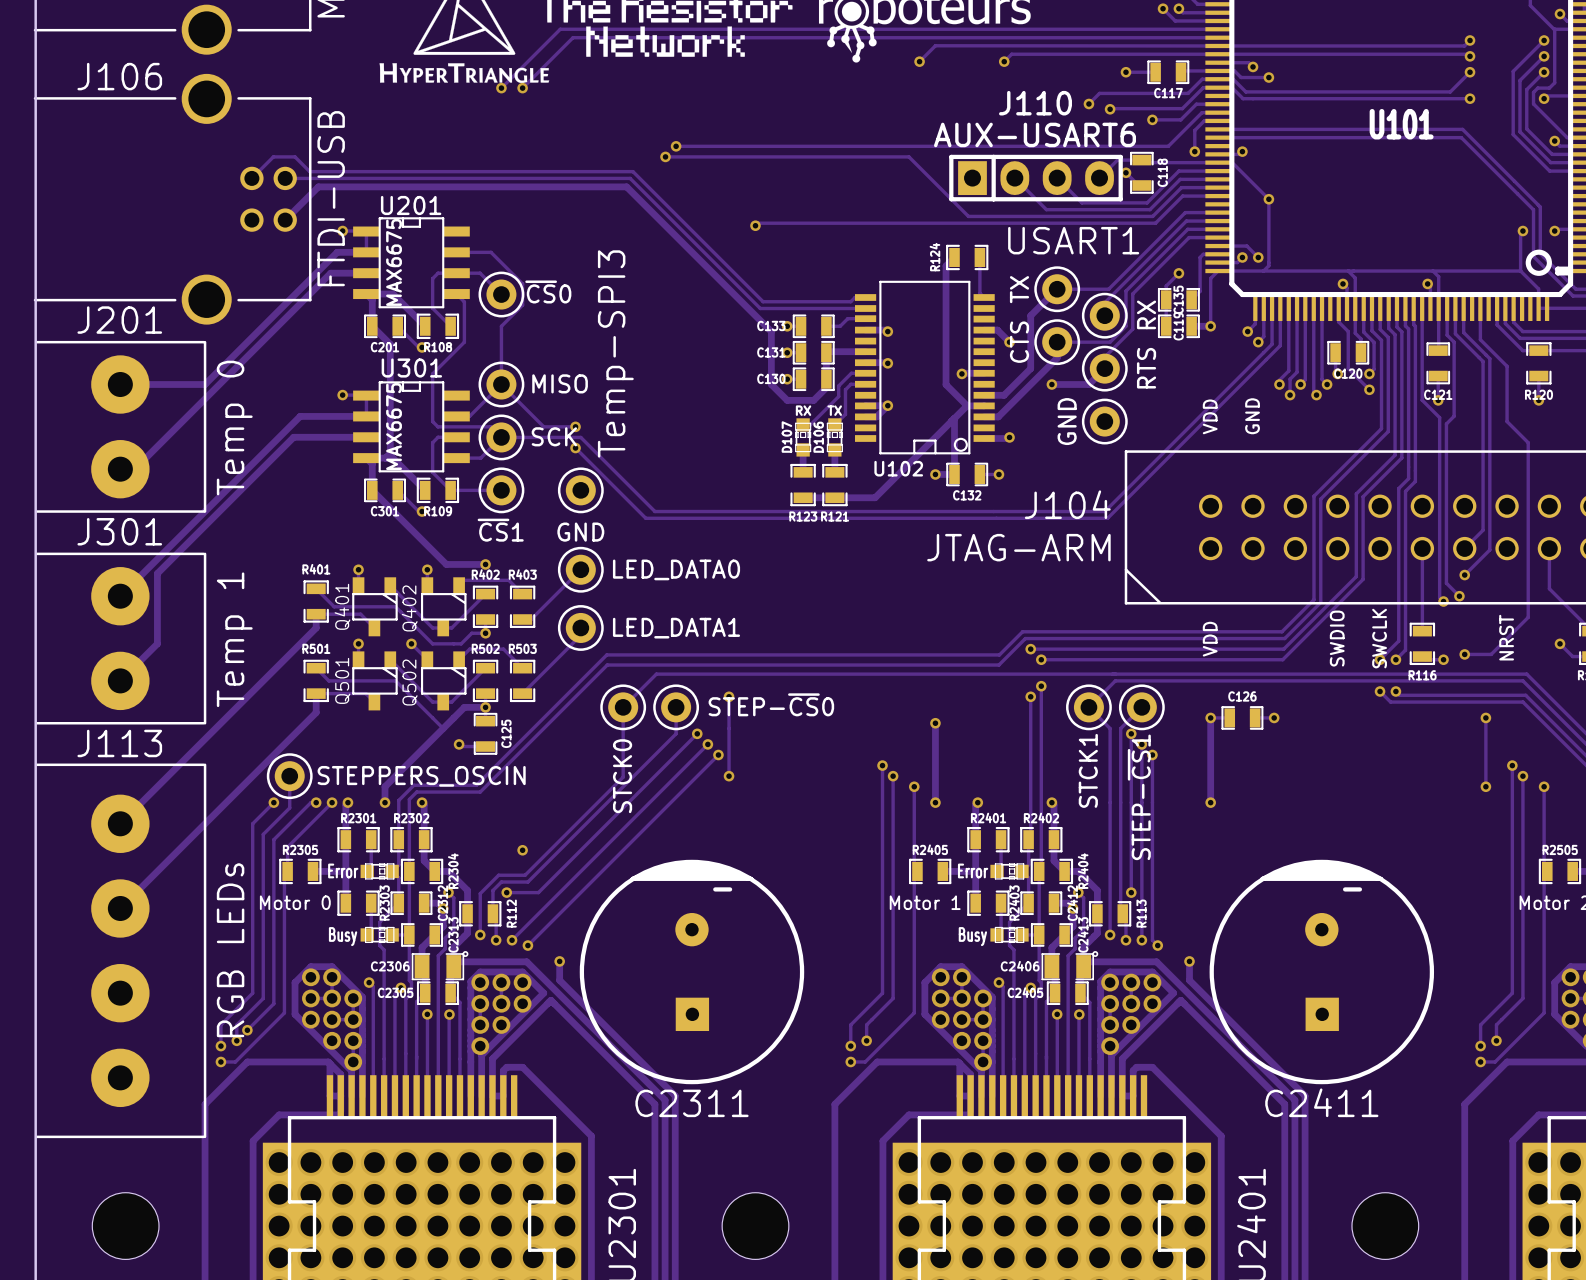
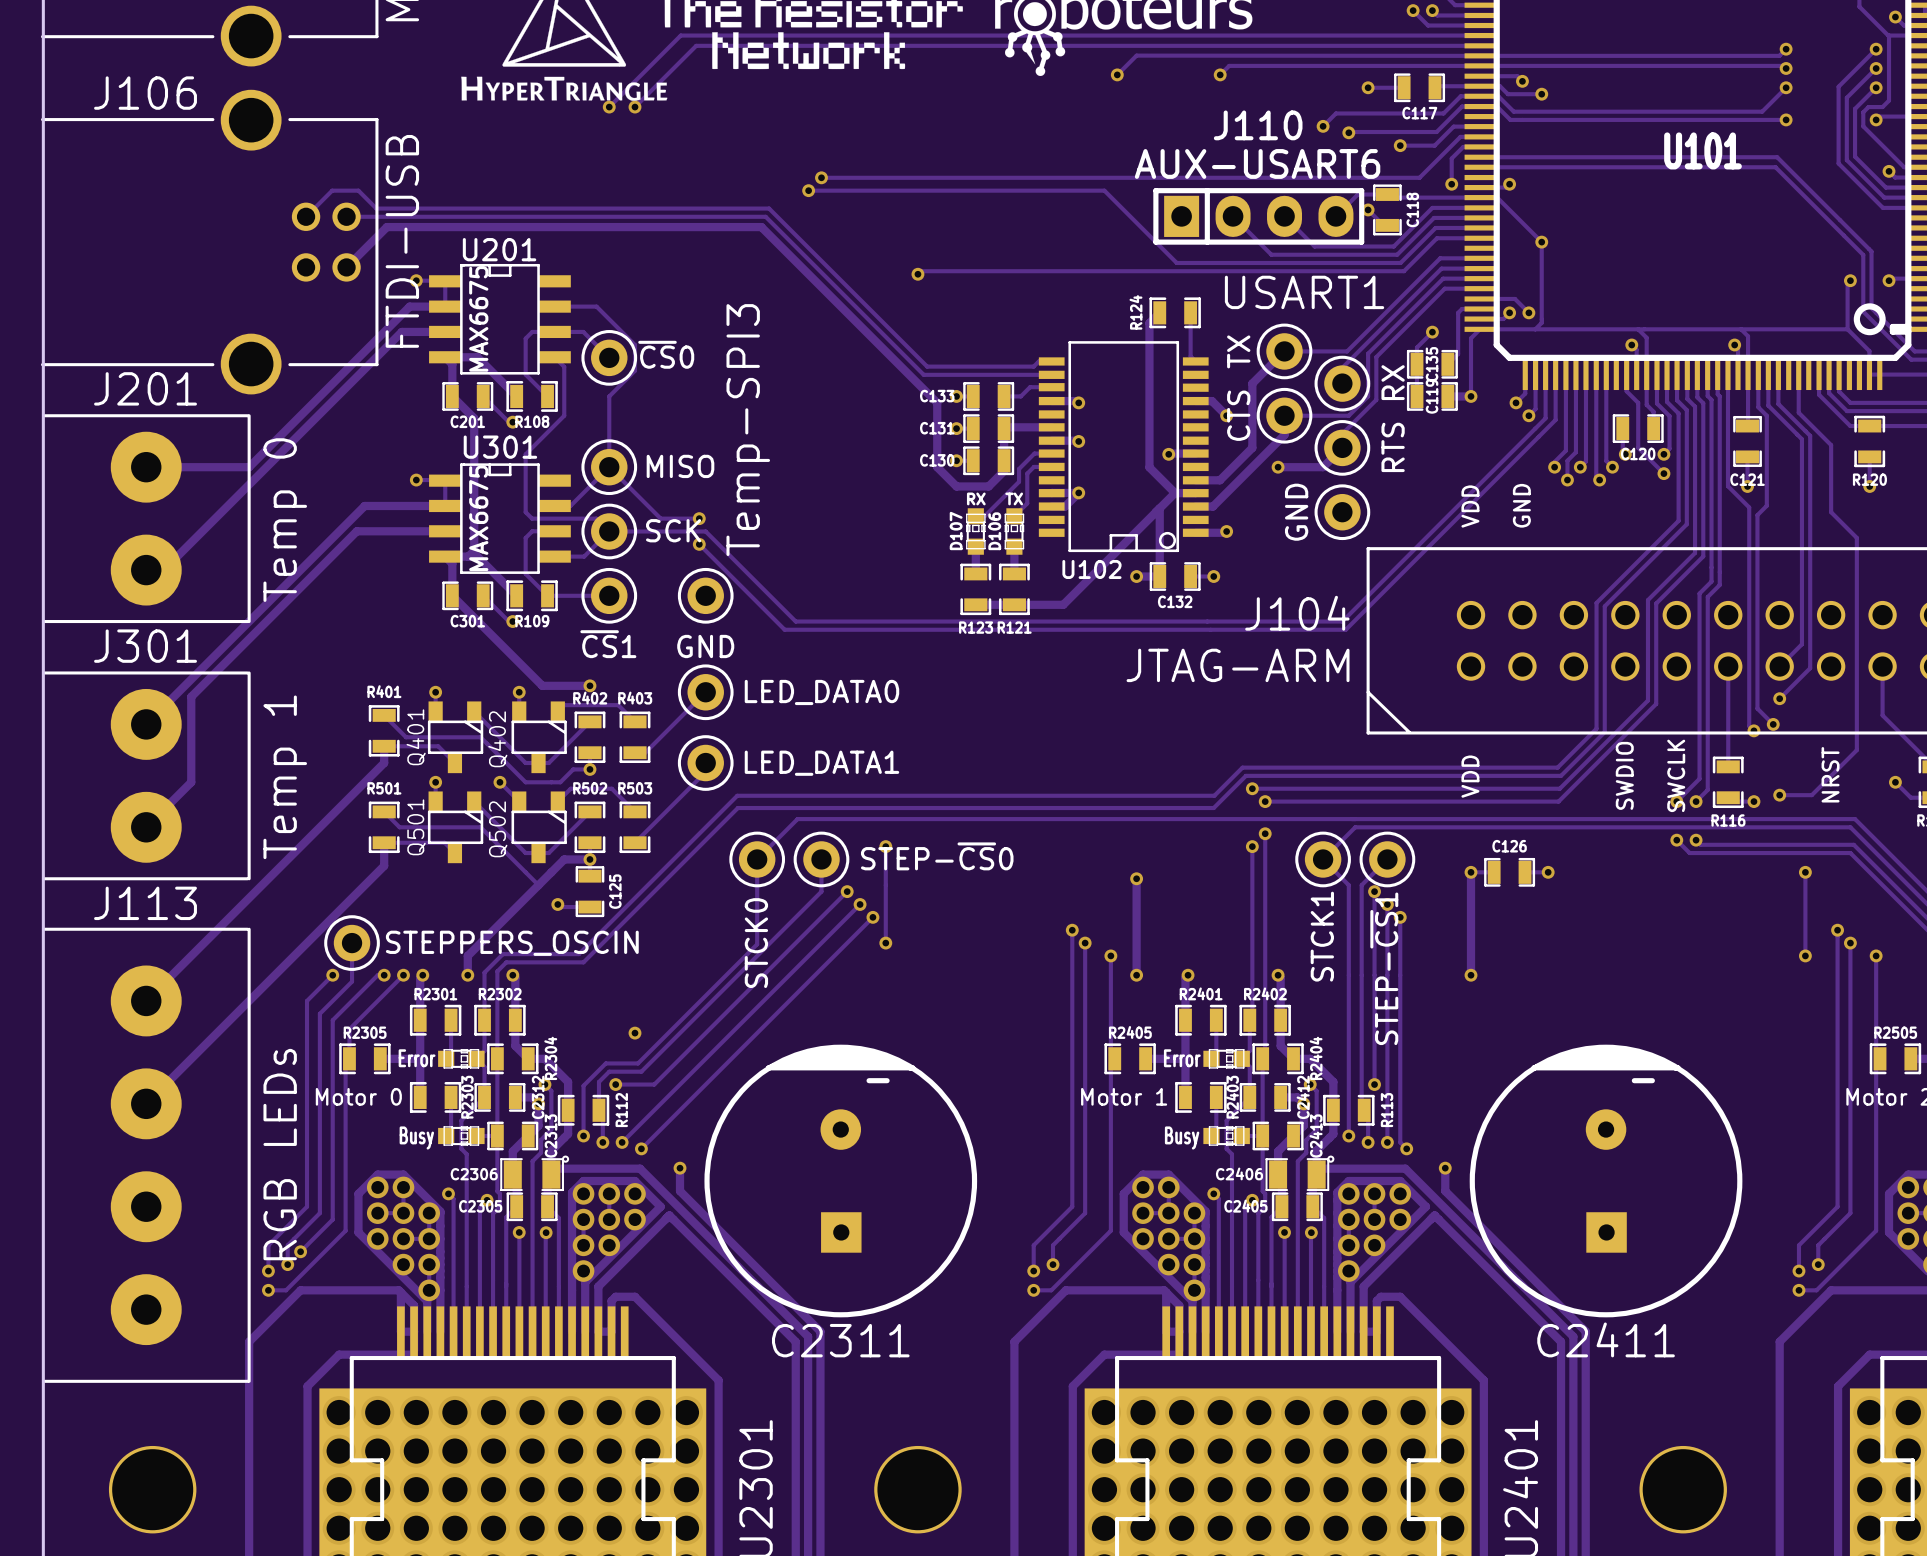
part footprint: [92, 1192, 160, 1260] -> [108, 1445, 197, 1534]
part footprint: [722, 1192, 789, 1260] -> [874, 1445, 962, 1534]
part footprint: [1351, 1192, 1419, 1260] -> [1639, 1445, 1727, 1534]

